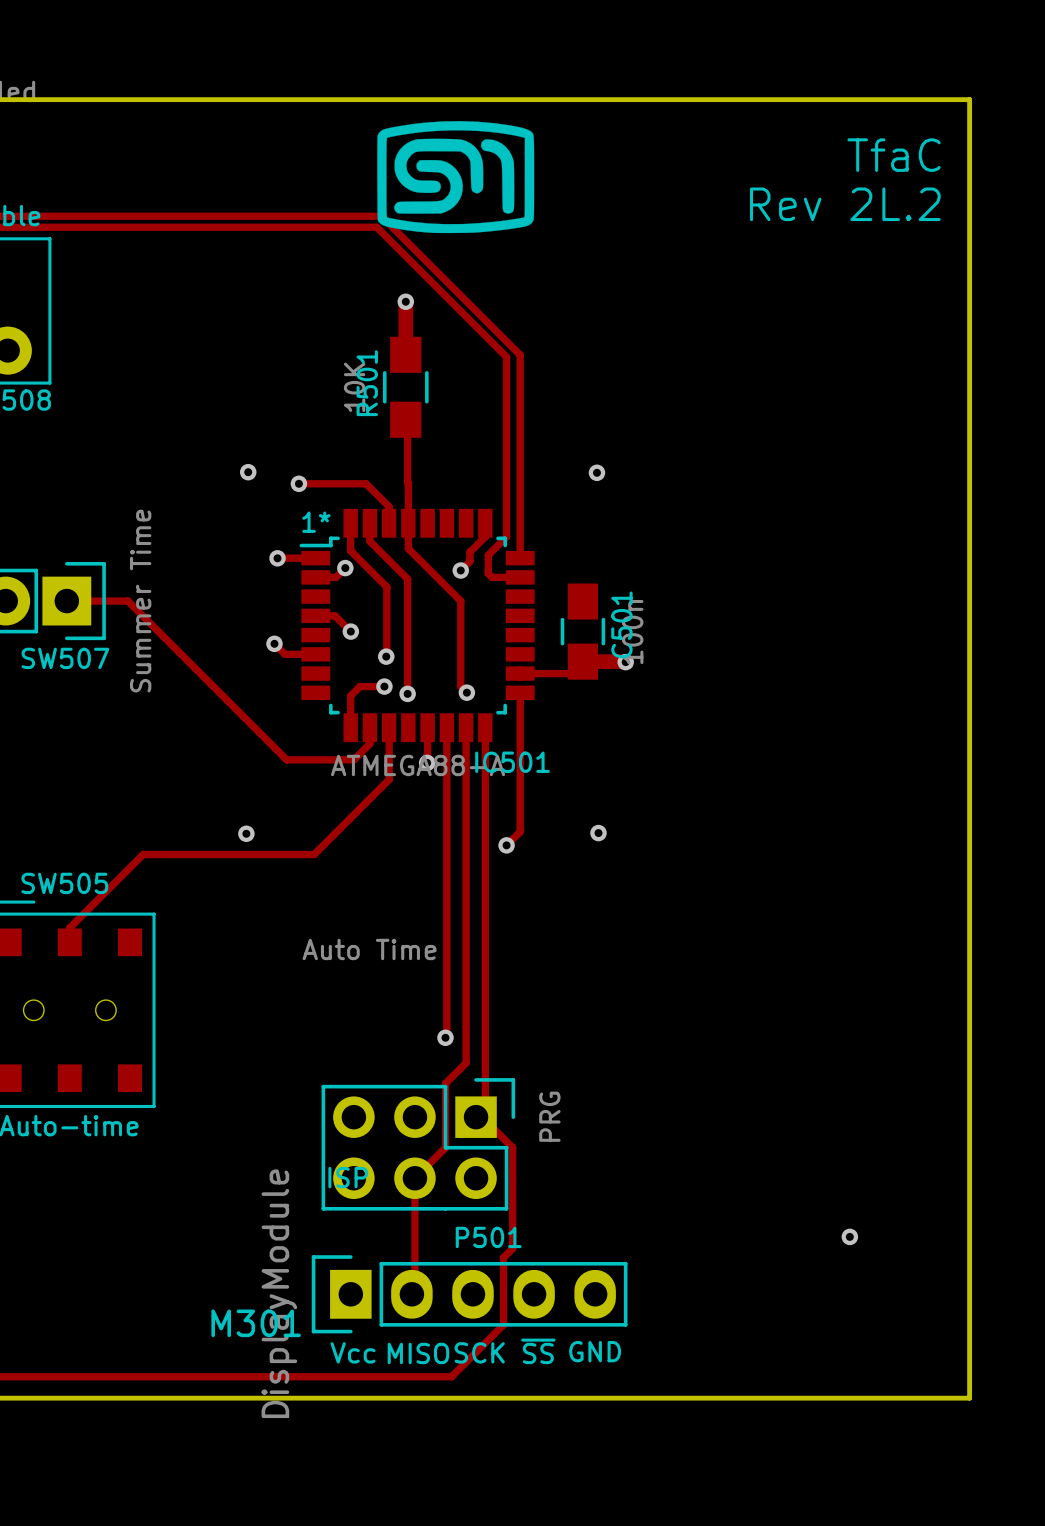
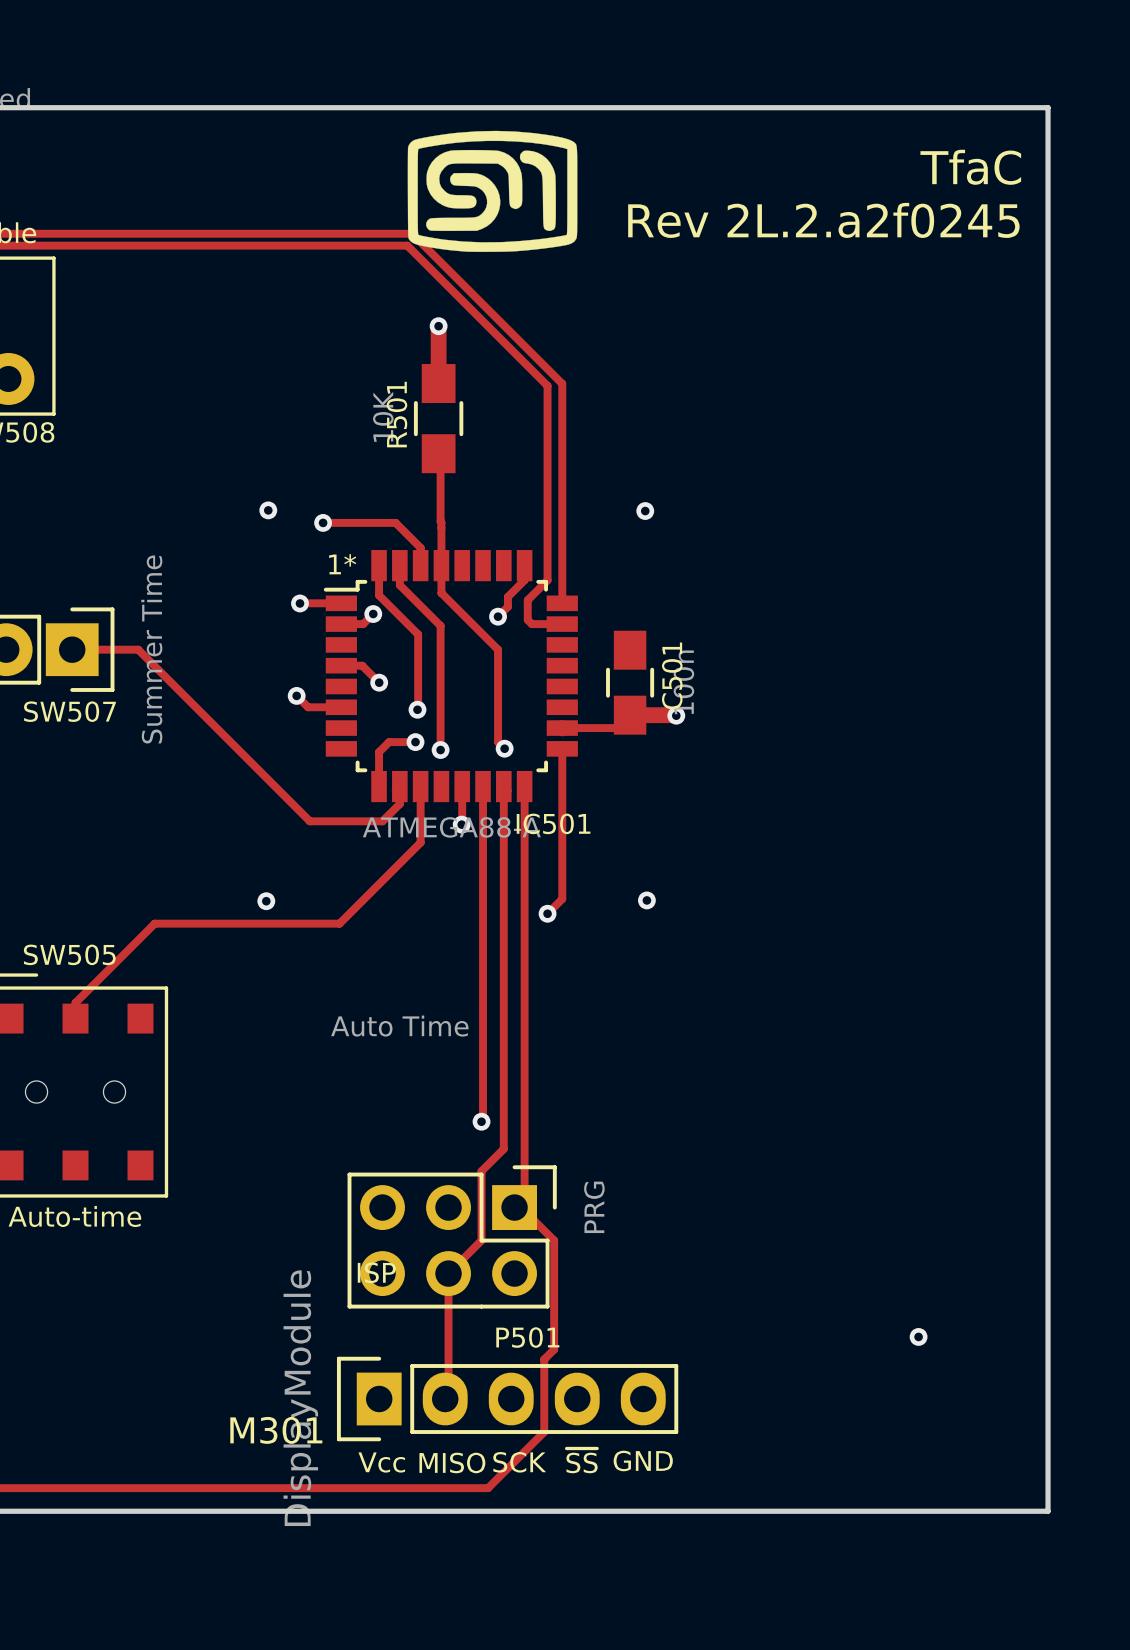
text: Rev 2L.2 (845, 204) -> Rev 2L.2.a2f0245 (823, 220)

